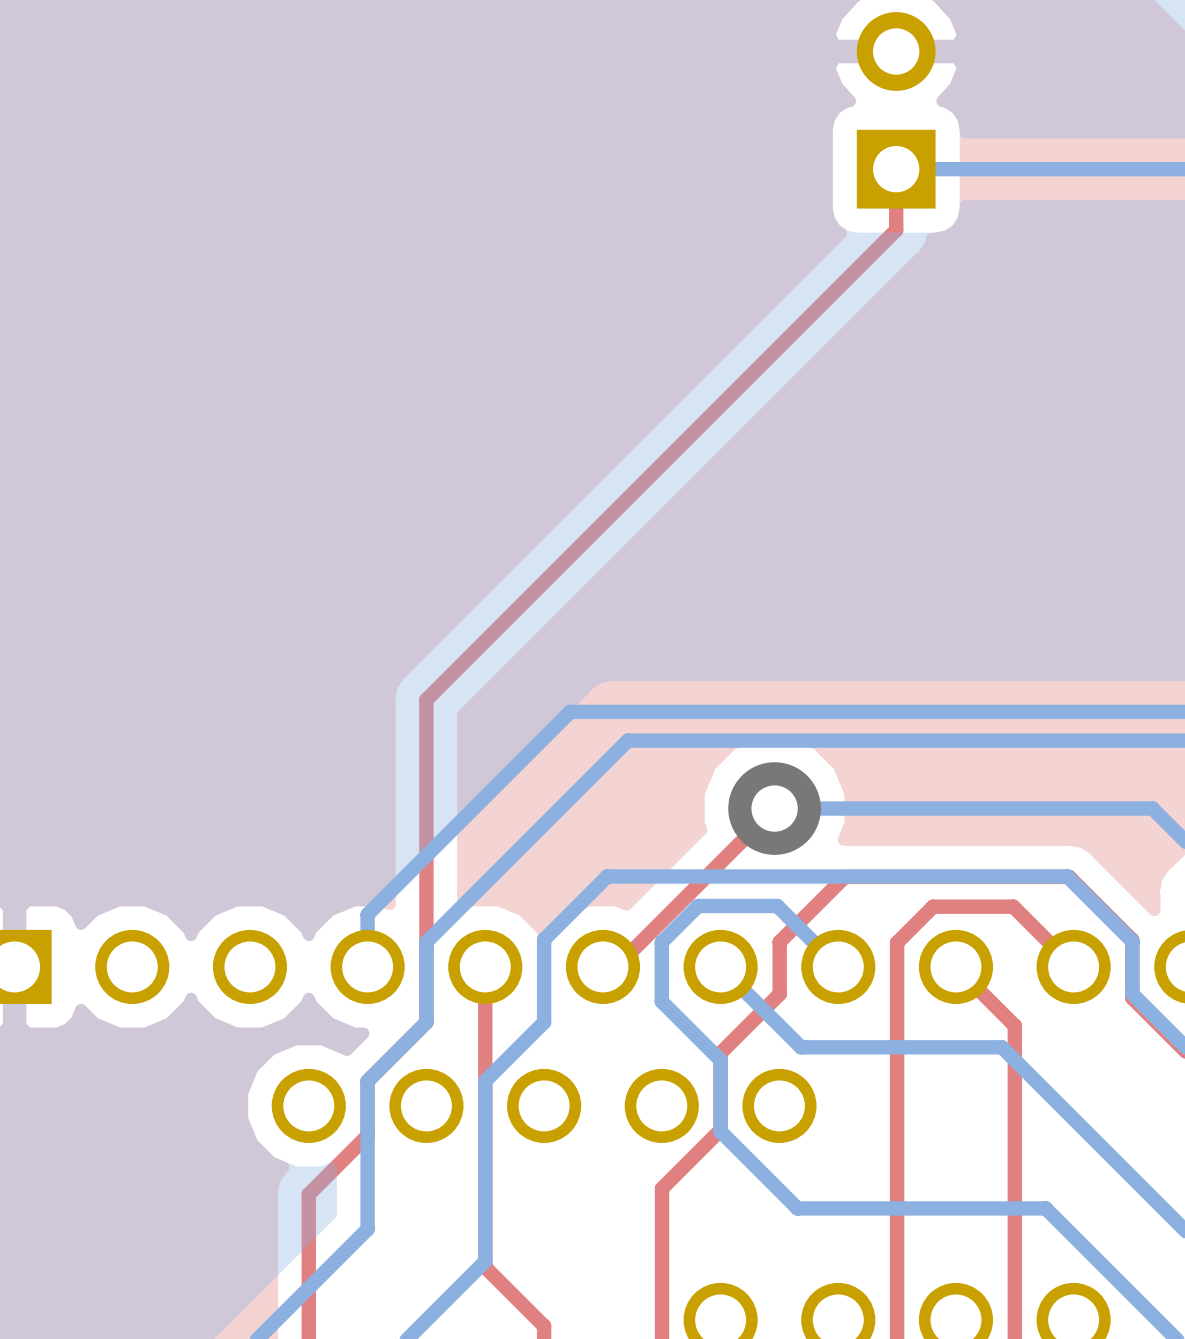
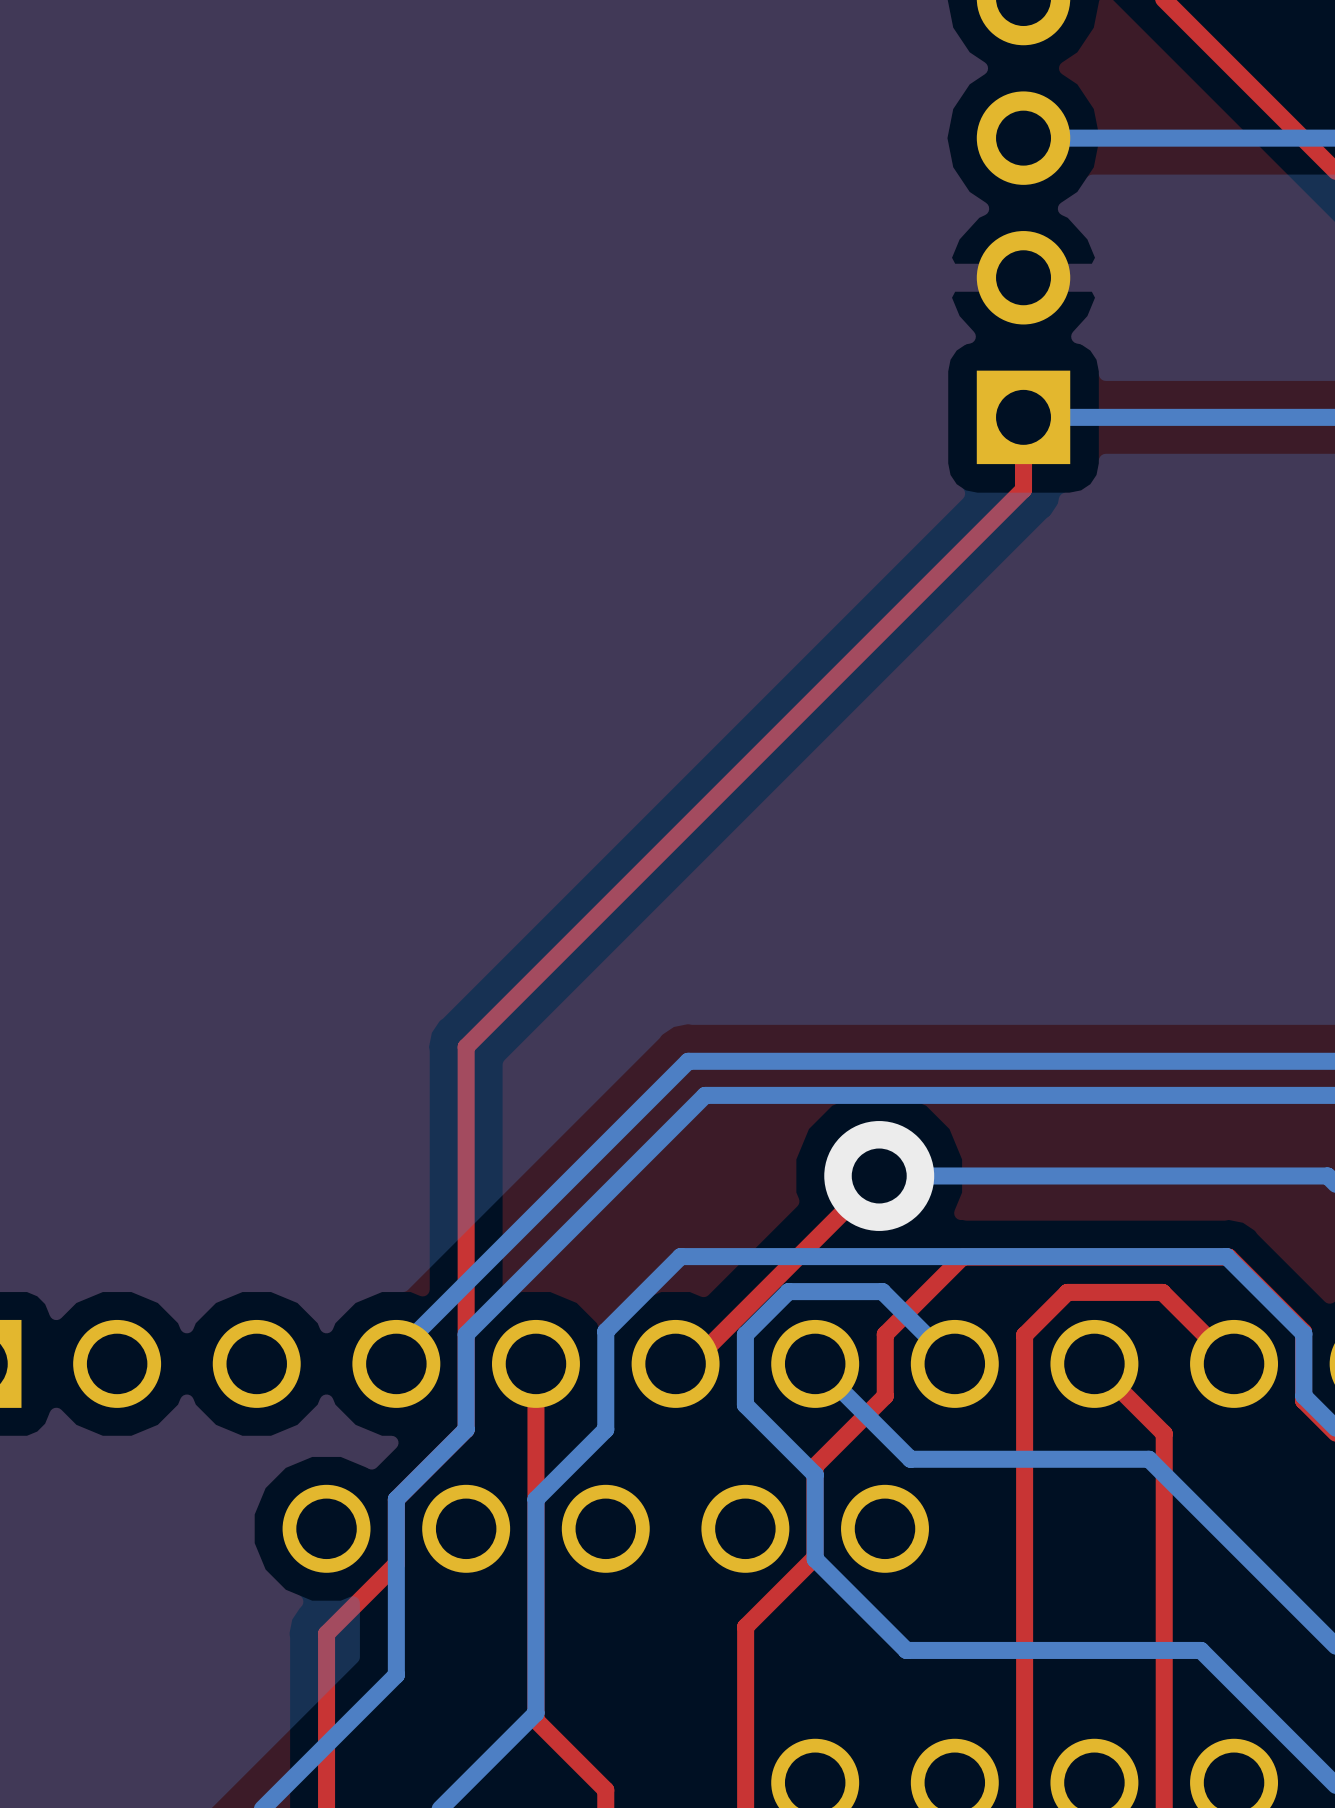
bottom track: (613, 711) (570, 711) (367, 914) (367, 957) -> (688, 1061) (396, 1353)

